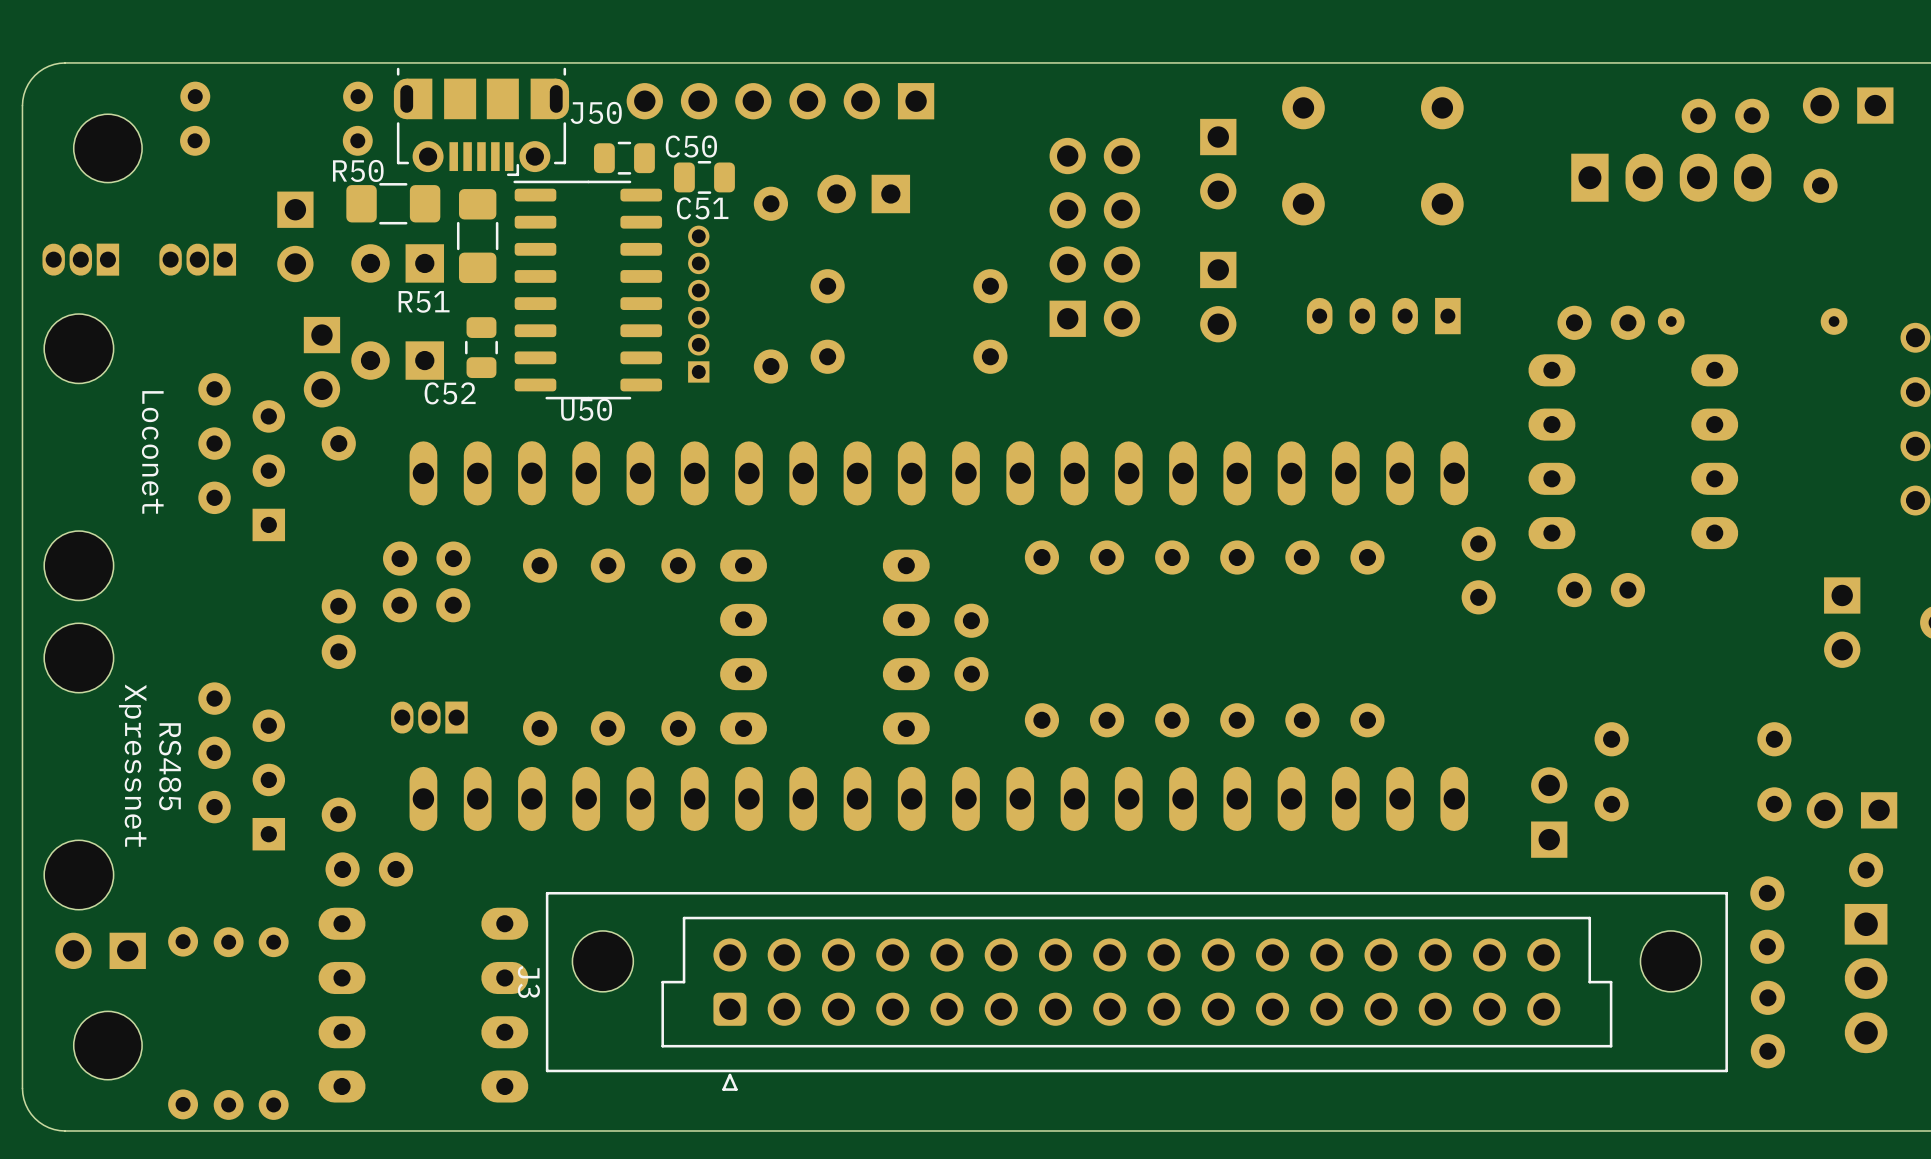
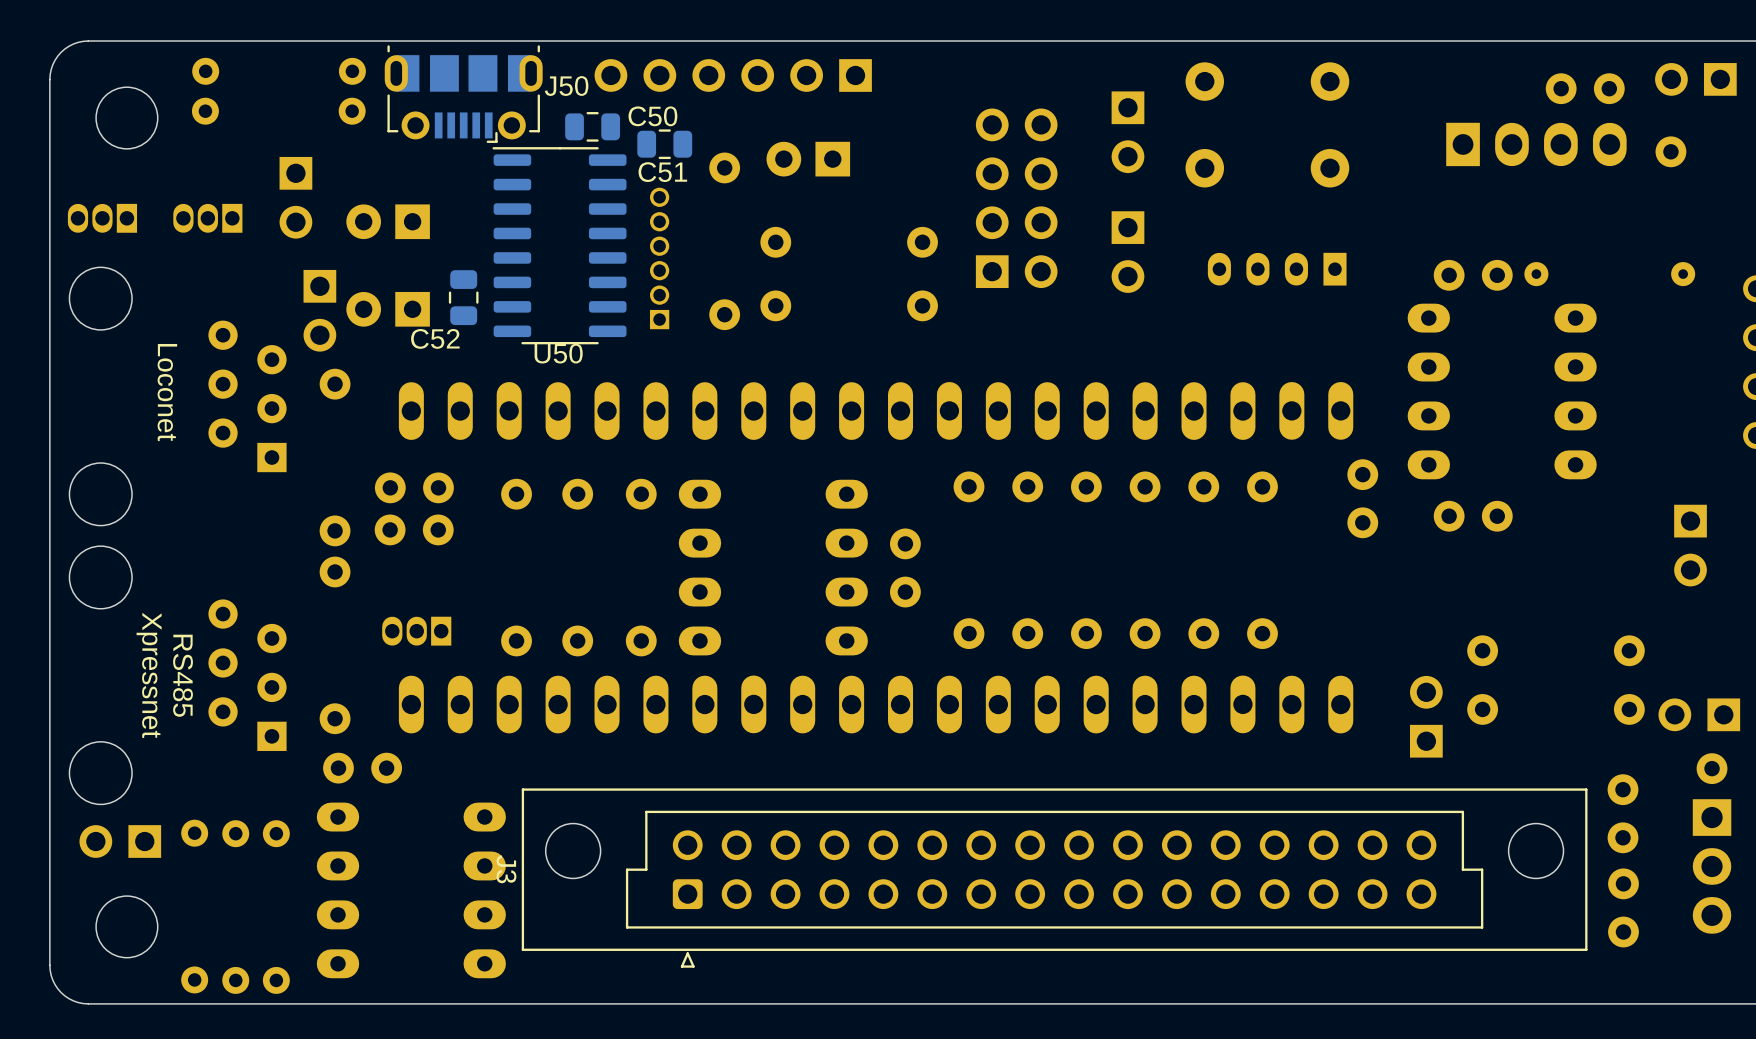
R50: (393, 203) -> none
R51: (477, 236) -> none

